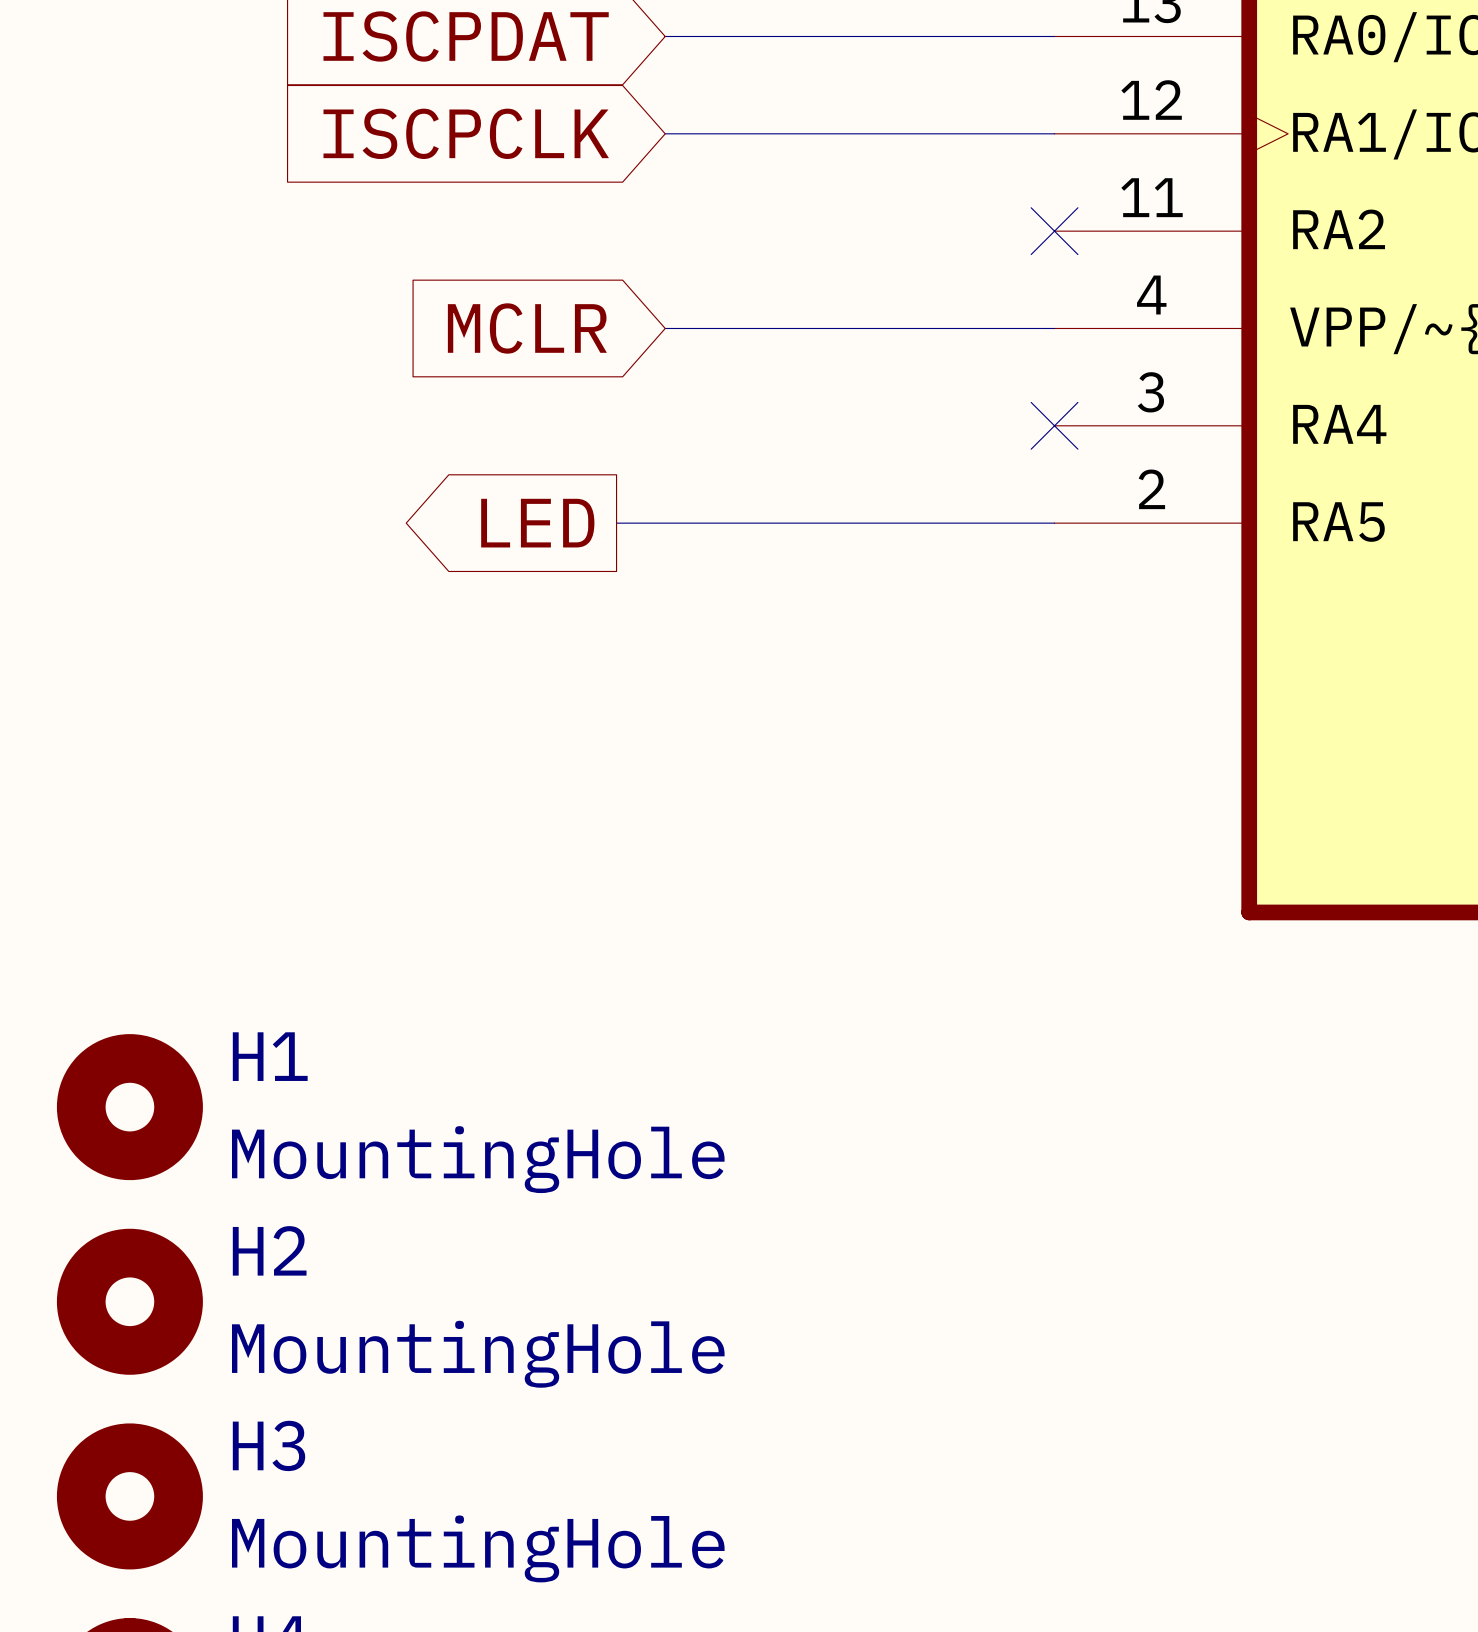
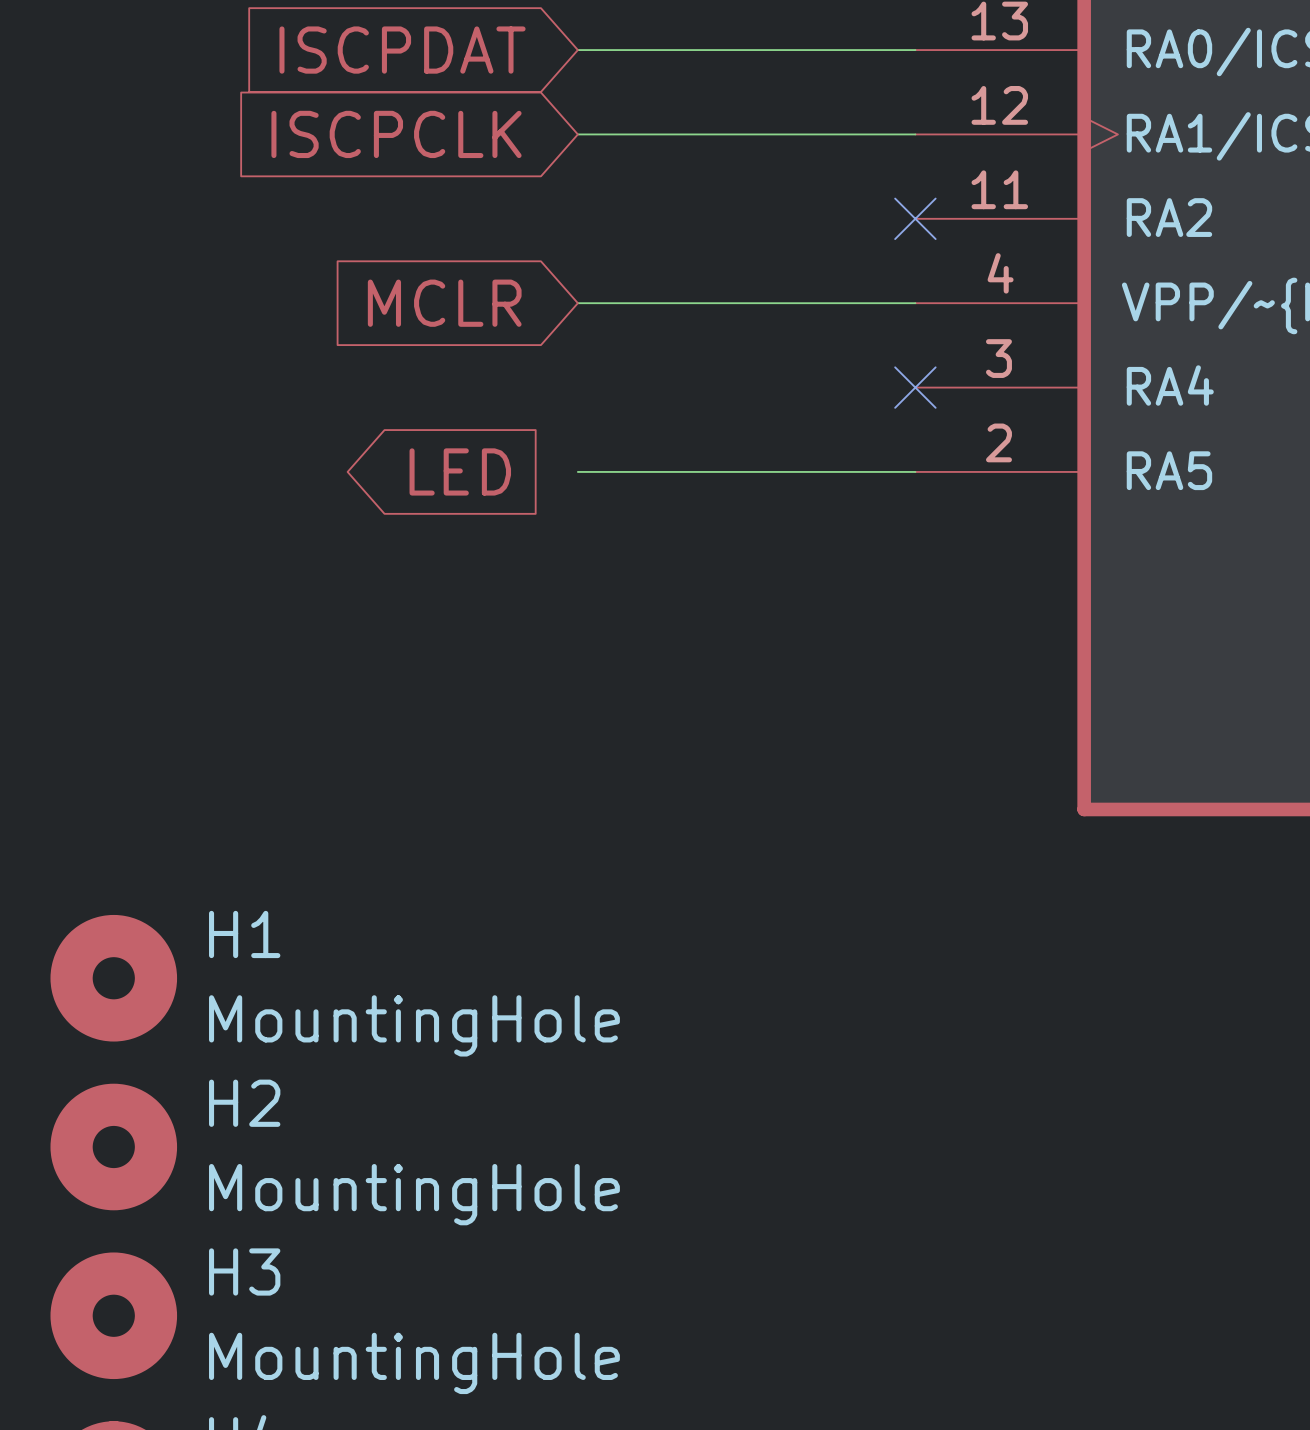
wire: (616, 523) (665, 523) -> none

